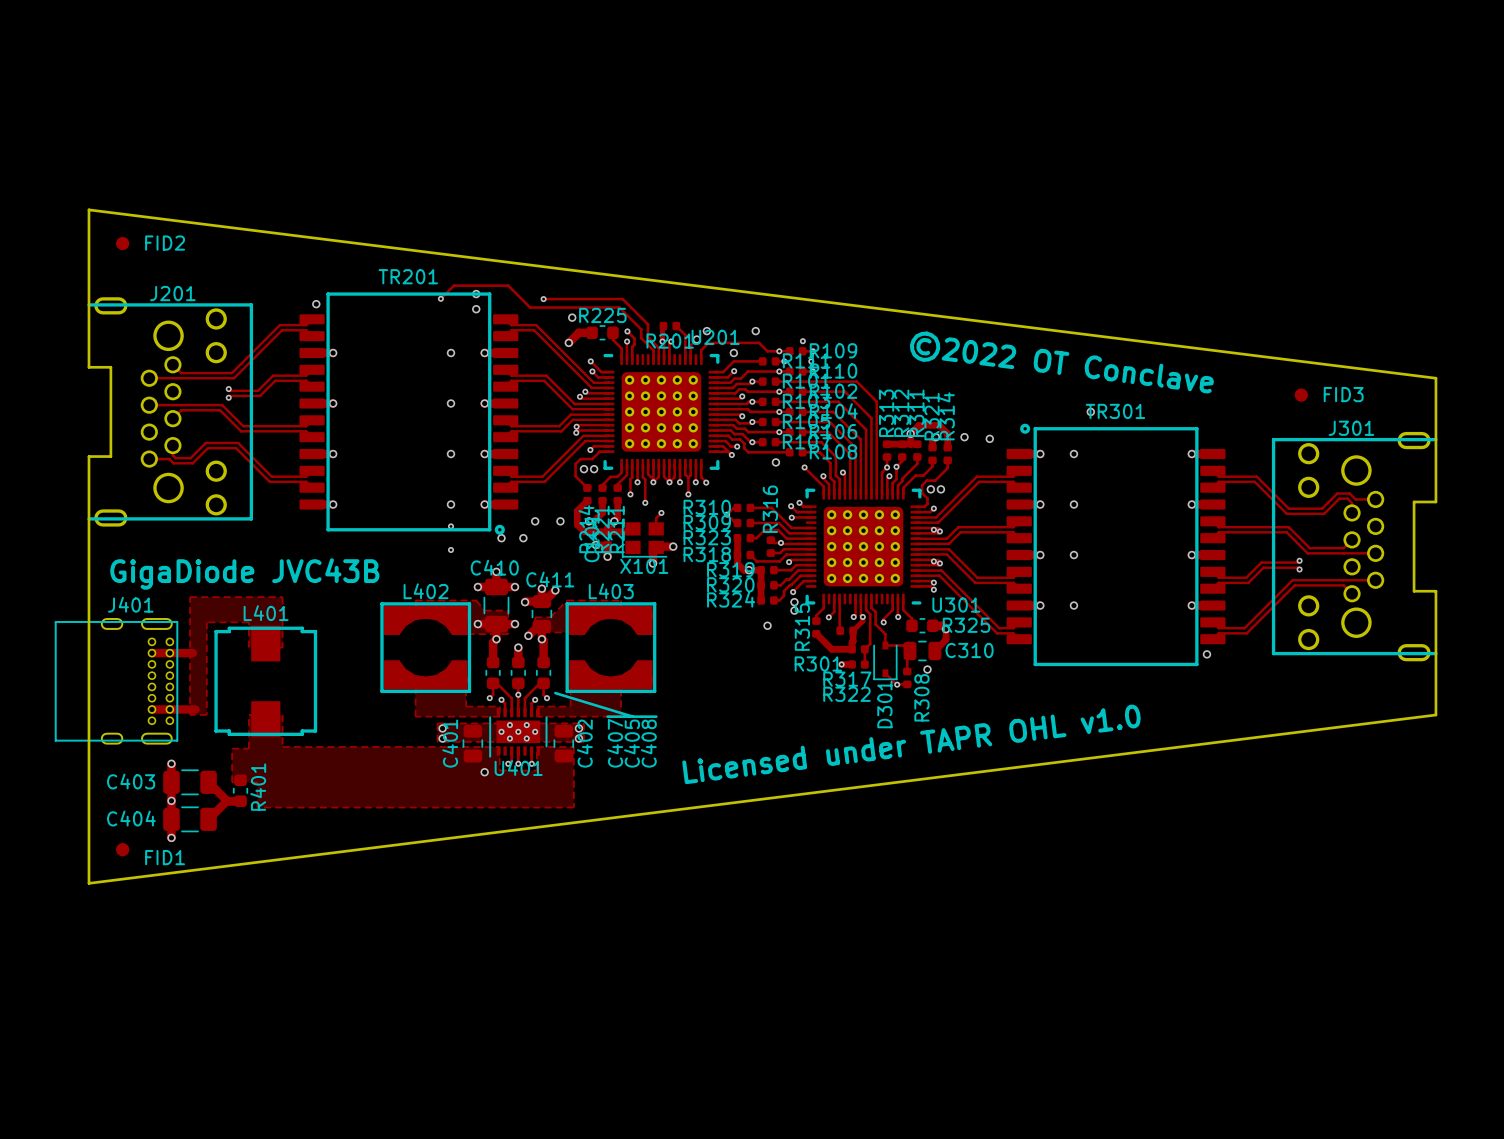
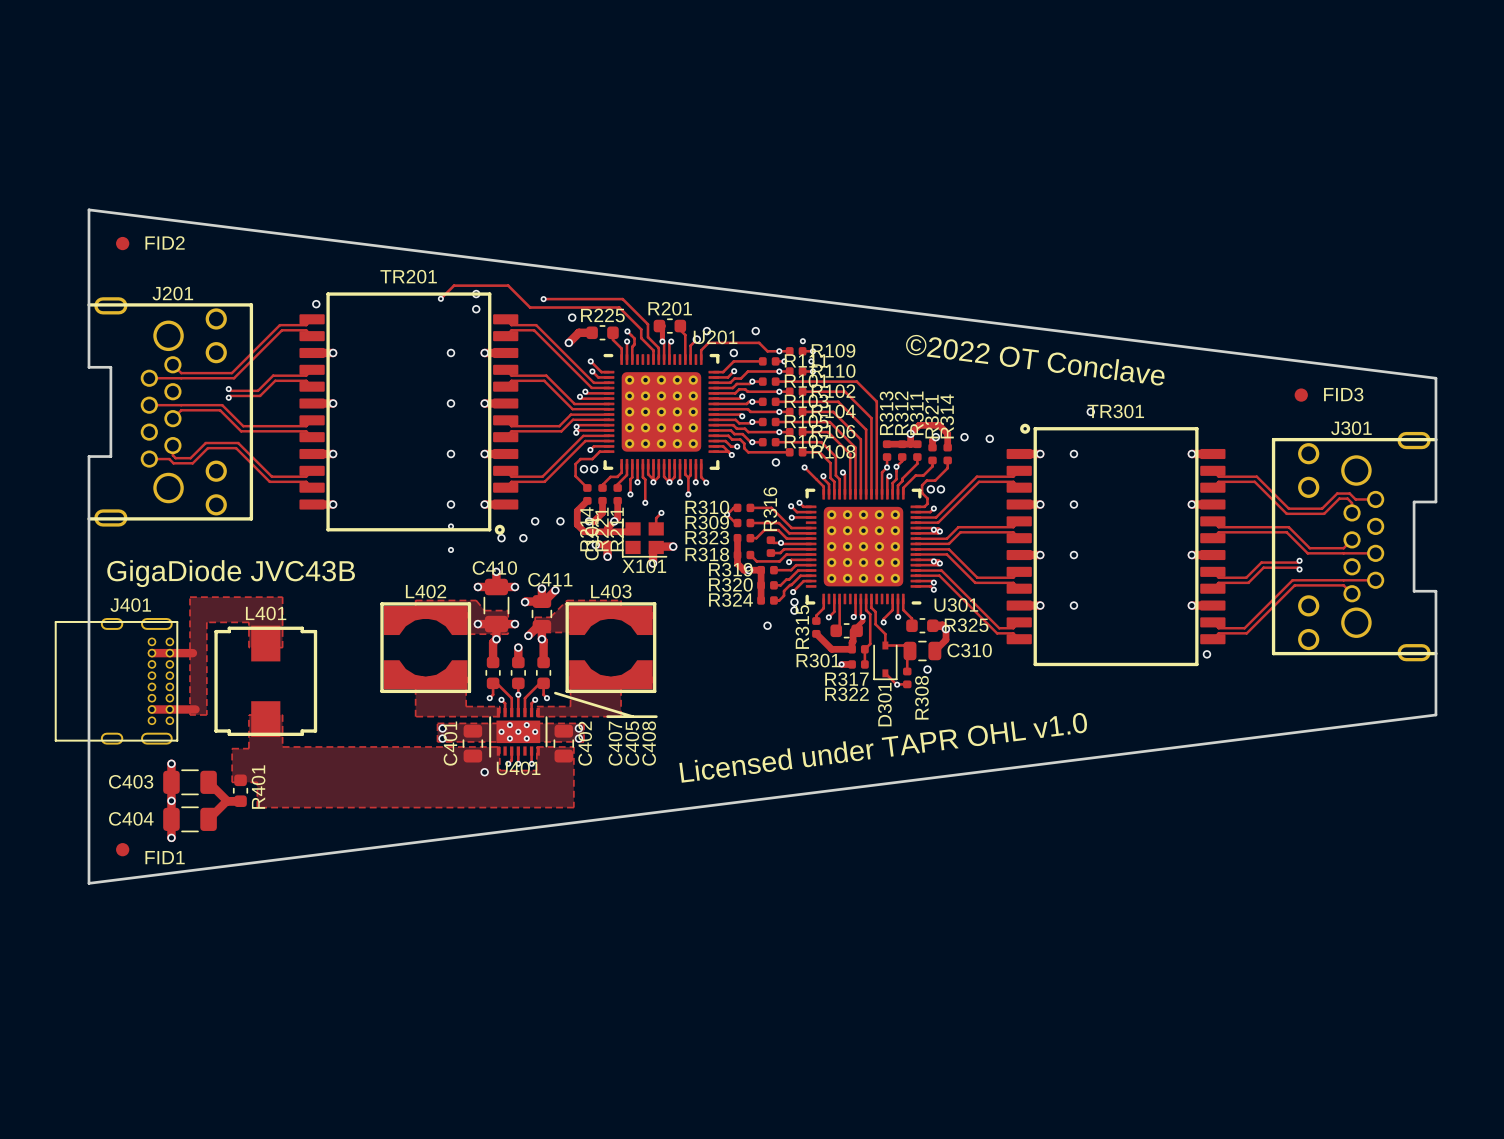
R201 footprint: [659, 321, 681, 331] -> [653, 318, 687, 334]
R201 name position: R201 (670, 341) -> R201 (670, 308)
R301 footprint: [836, 626, 858, 636] -> [830, 623, 863, 639]

